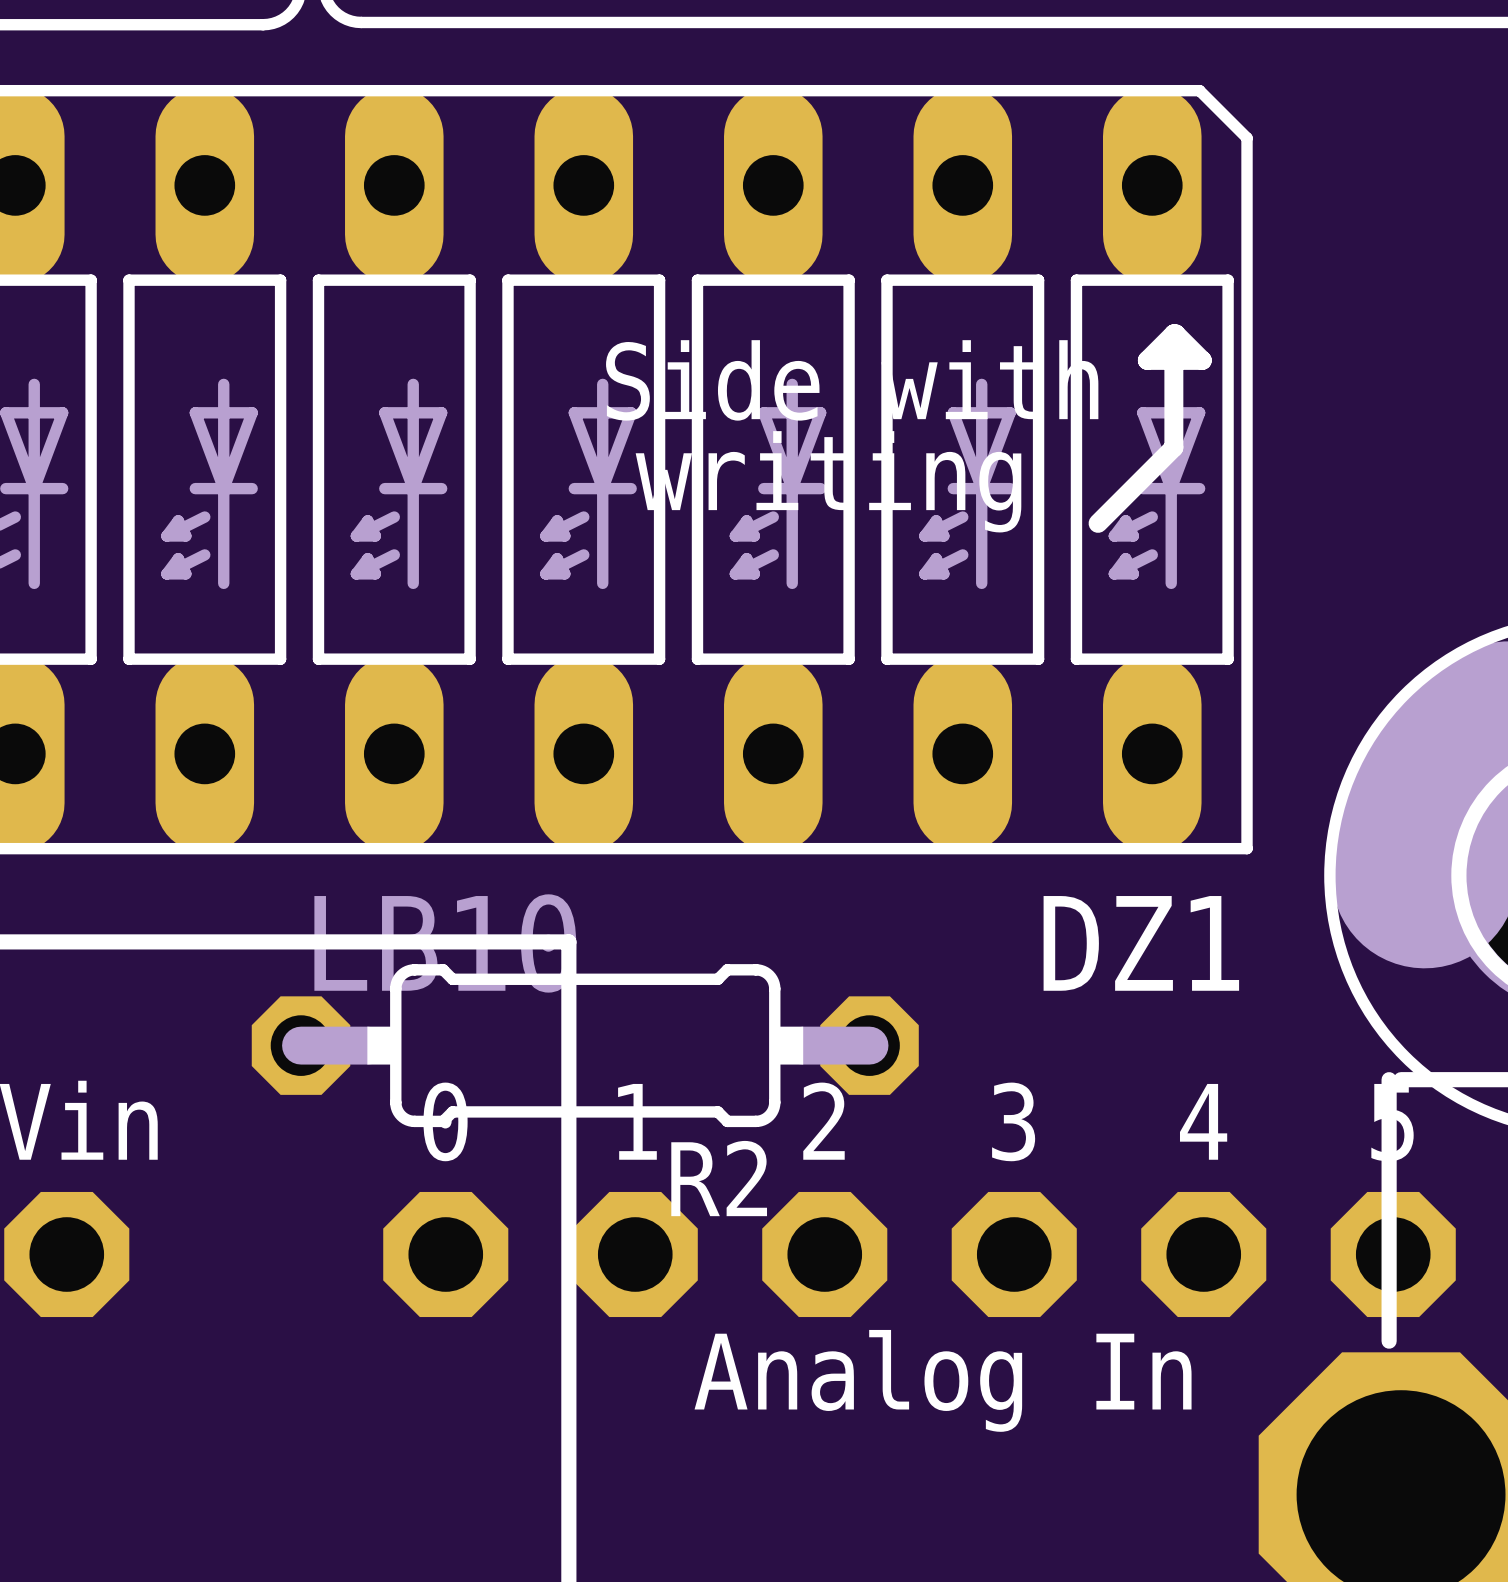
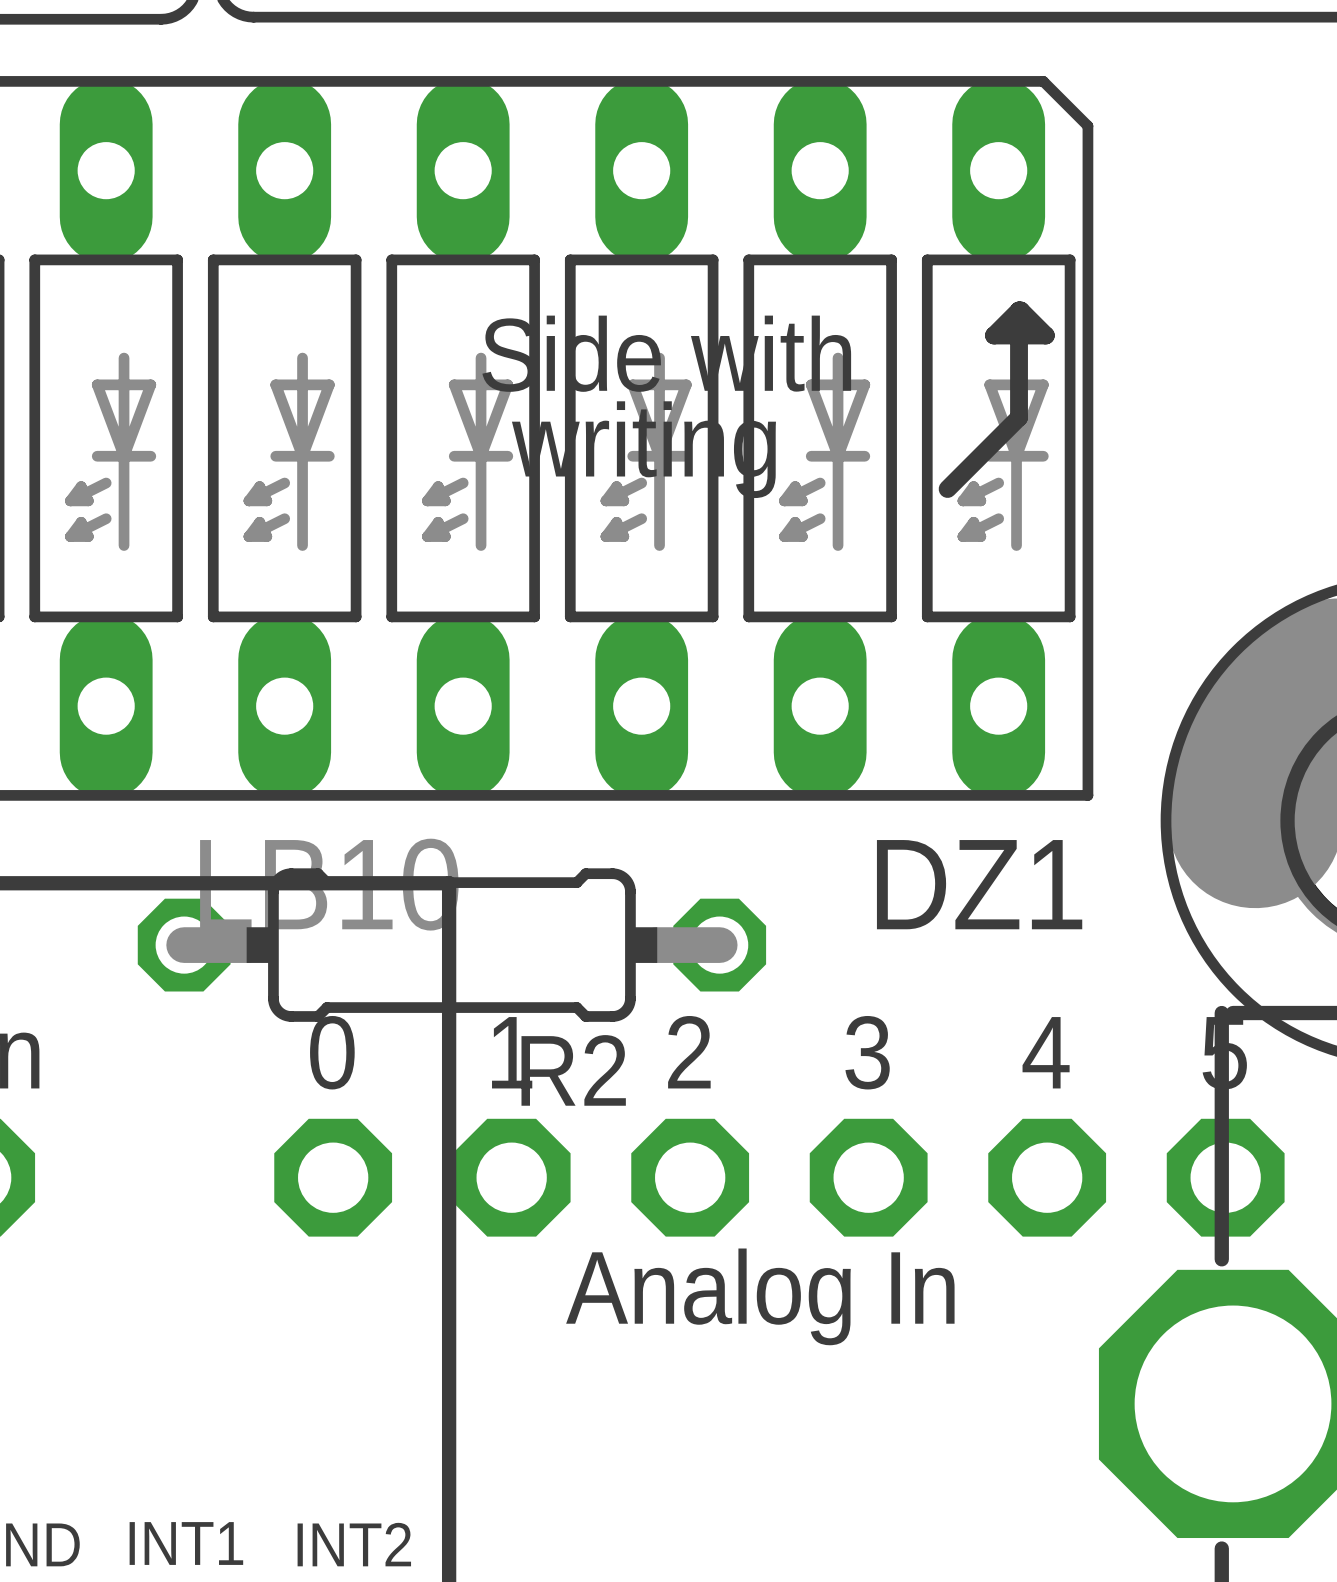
R2 position: (585, 1045) -> (451, 945)

